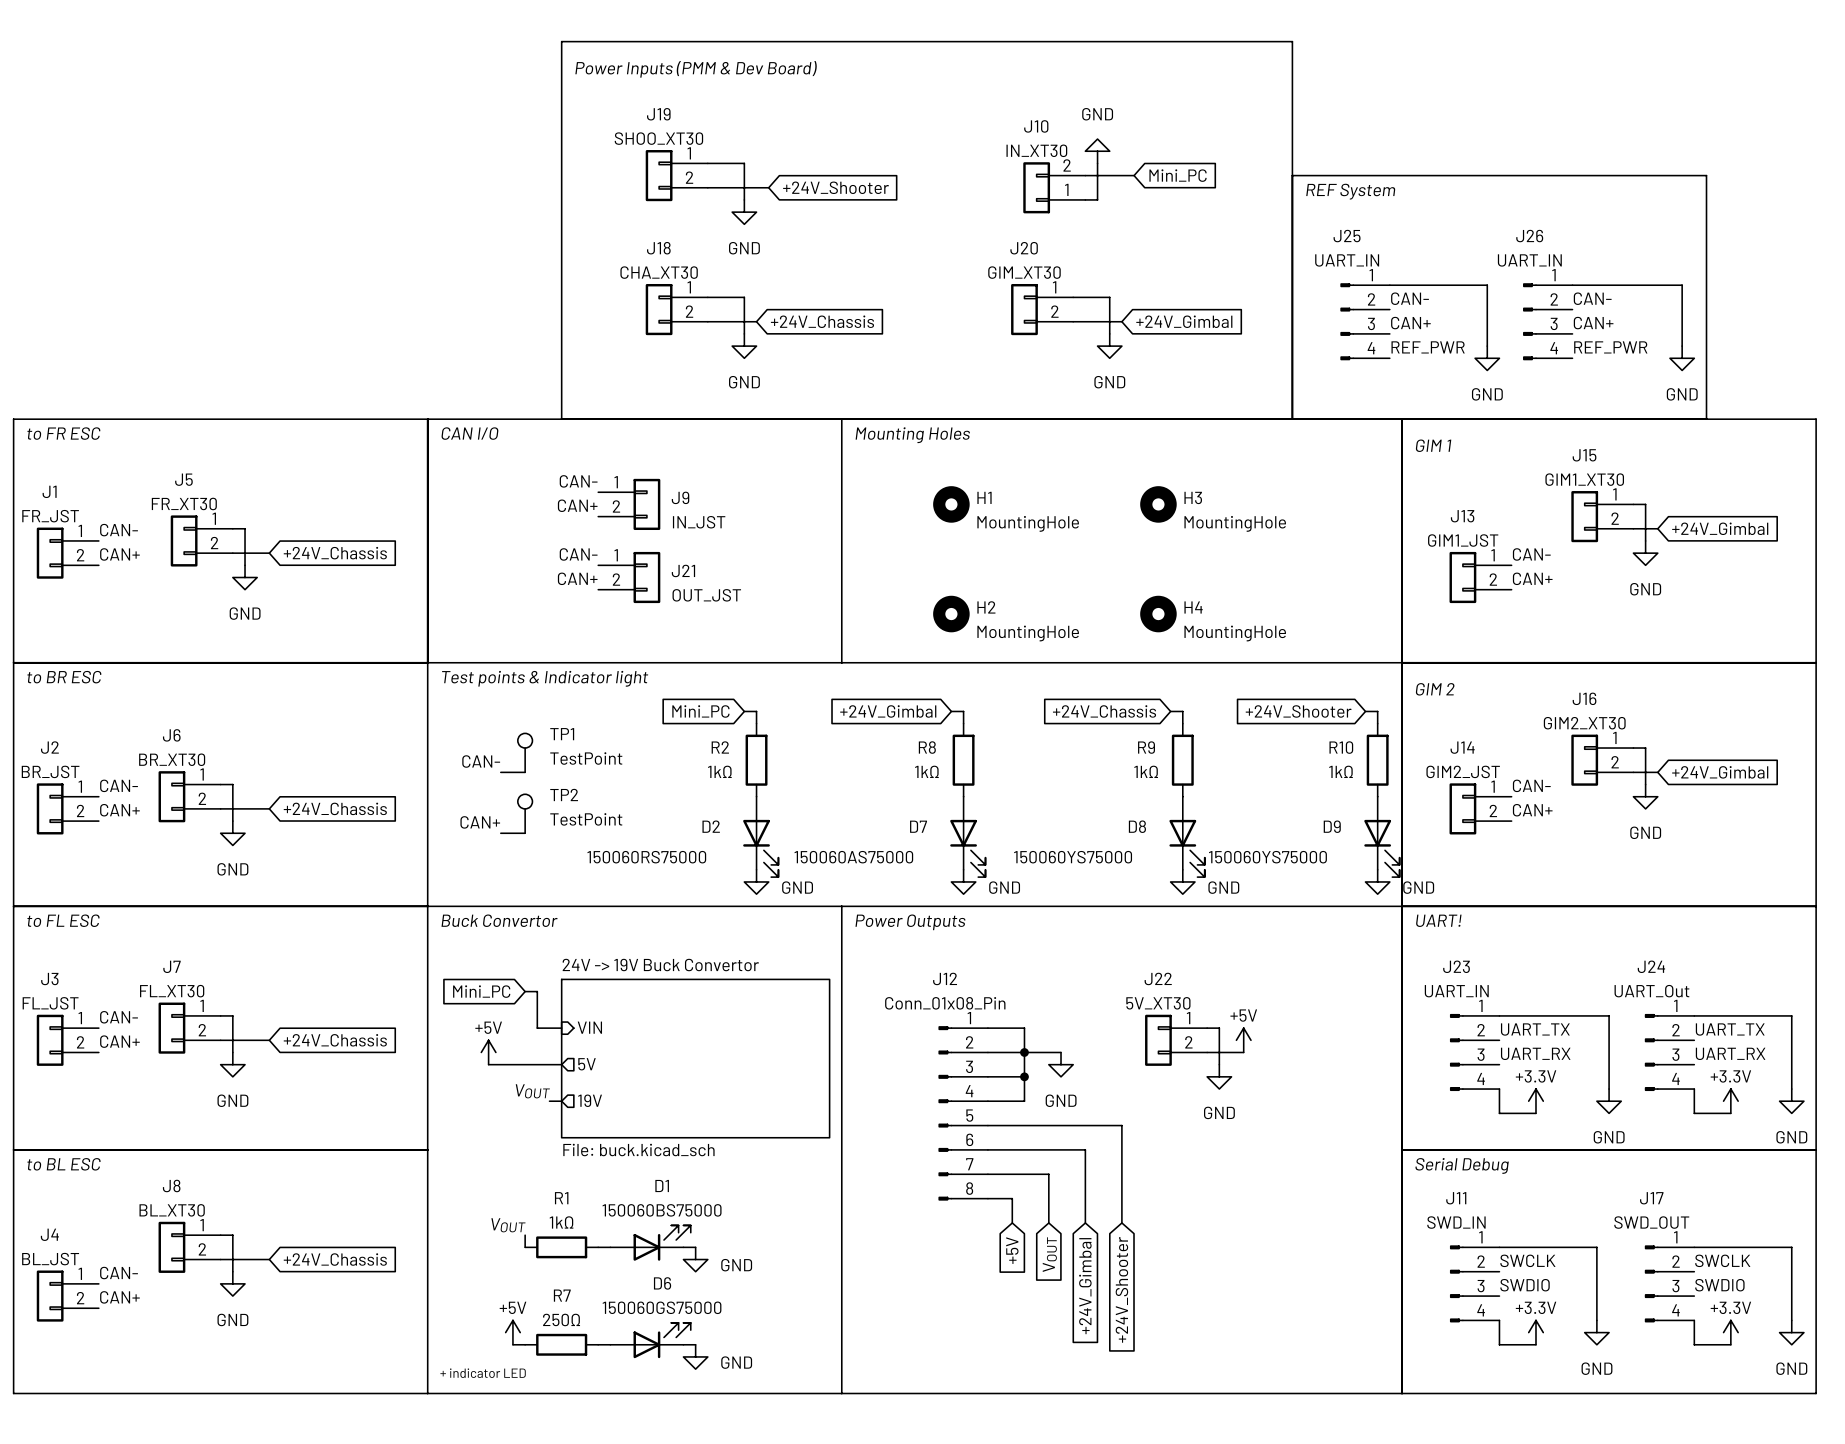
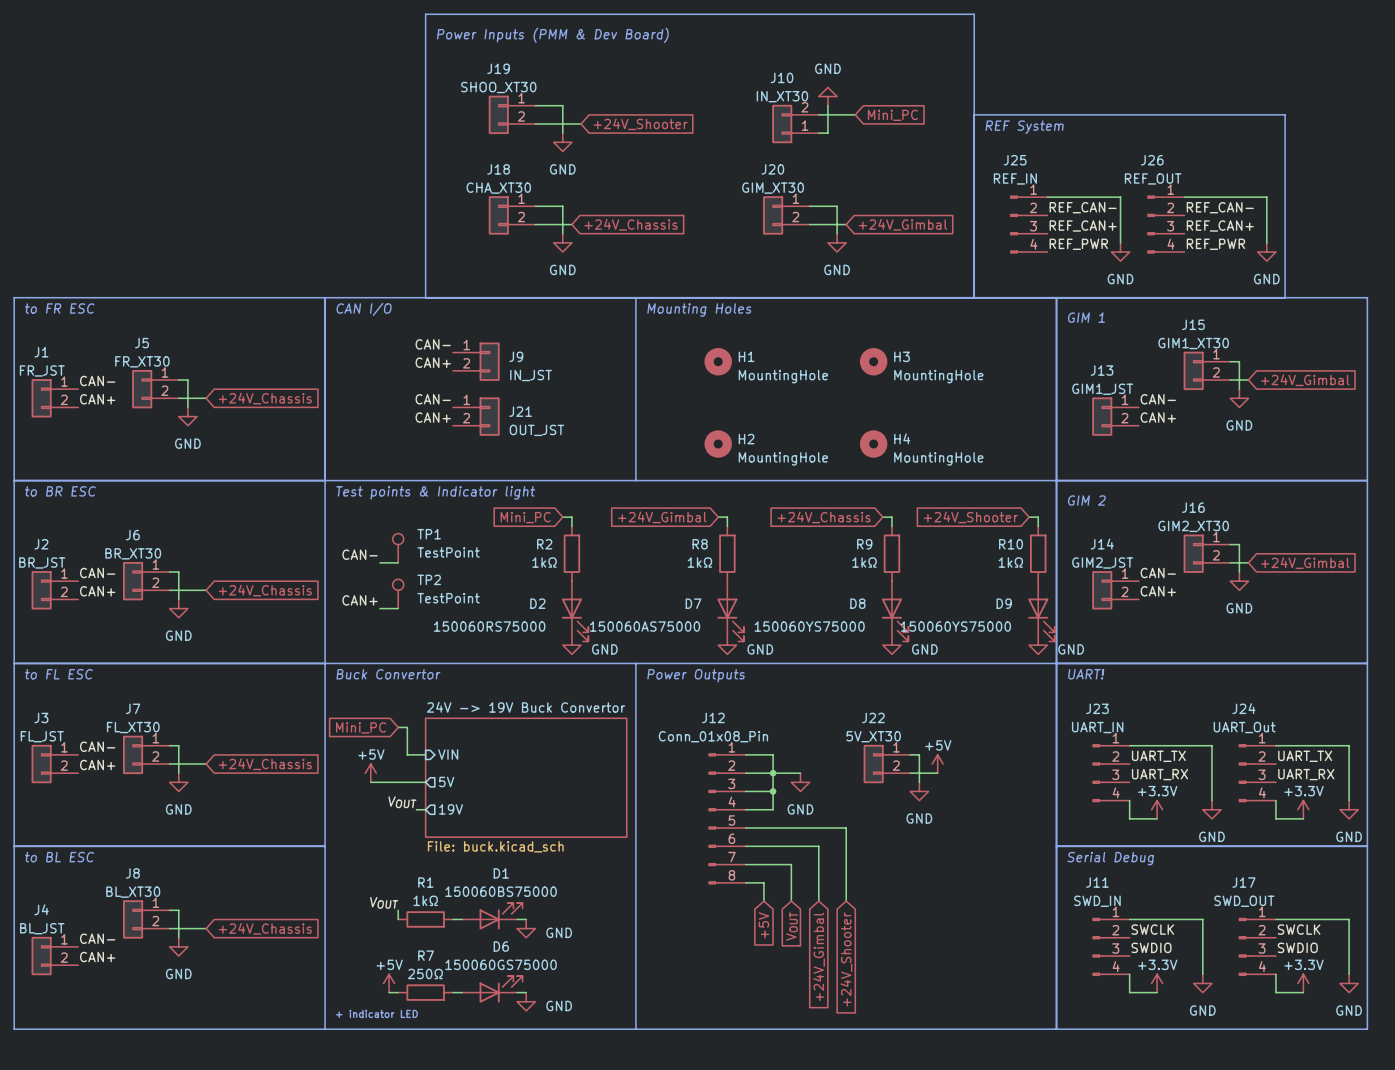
J25 value: UART_IN (1347, 260) -> REF_IN (1015, 178)
J26 value: UART_IN (1529, 260) -> REF_OUT (1153, 178)
label: CAN- (1410, 298) -> REF_CAN- (1083, 207)
label: CAN- (1592, 298) -> REF_CAN- (1220, 207)
label: CAN+ (1410, 323) -> REF_CAN+ (1083, 225)
label: CAN+ (1593, 323) -> REF_CAN+ (1220, 225)

